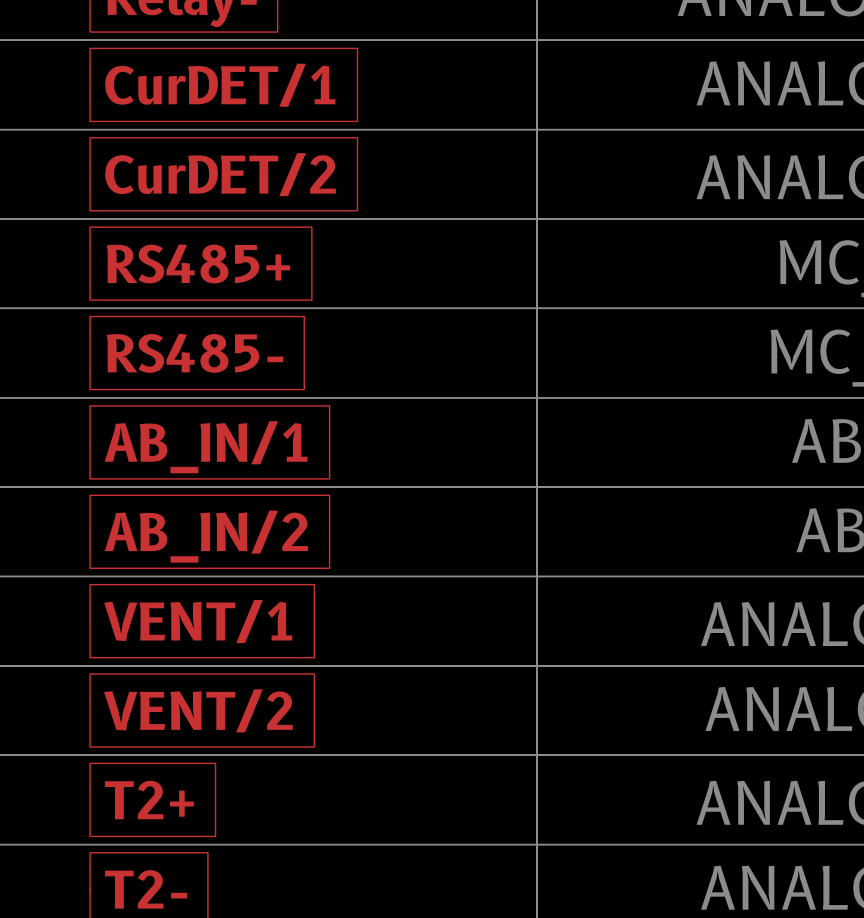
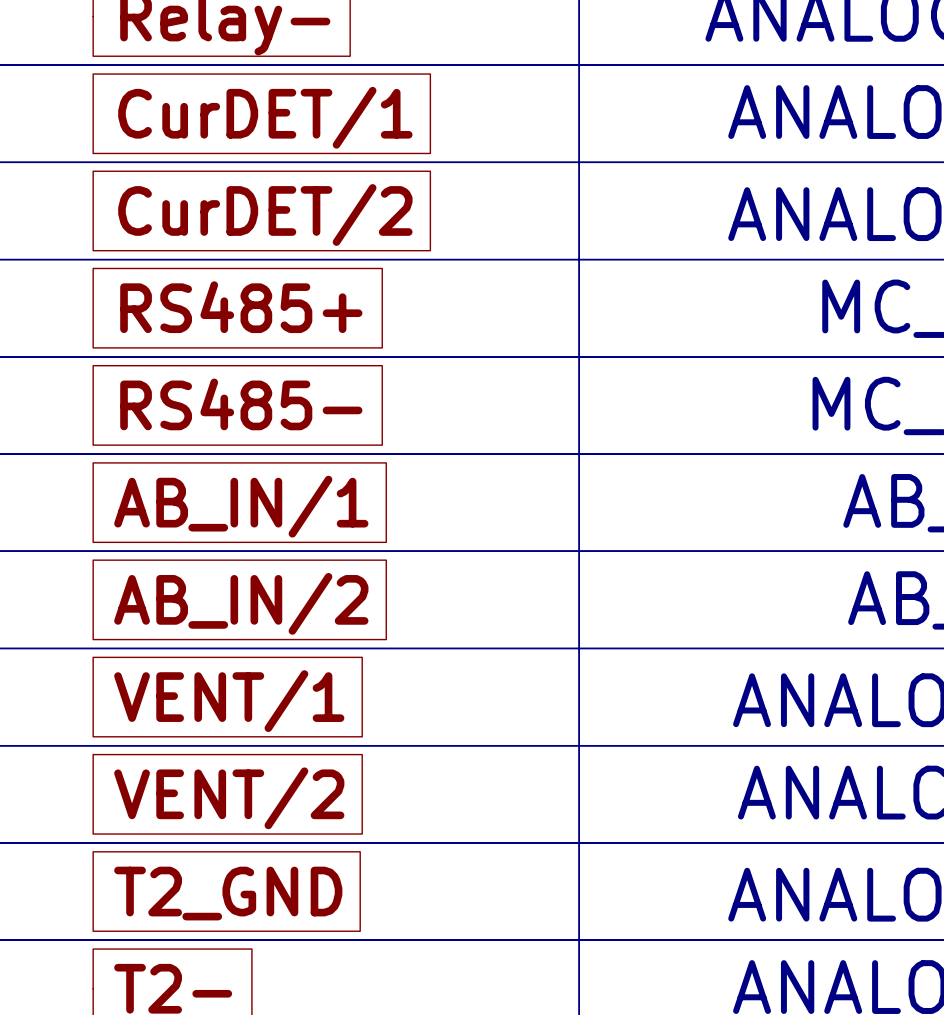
global label: T2+ (149, 800) -> T2_GND (228, 893)

